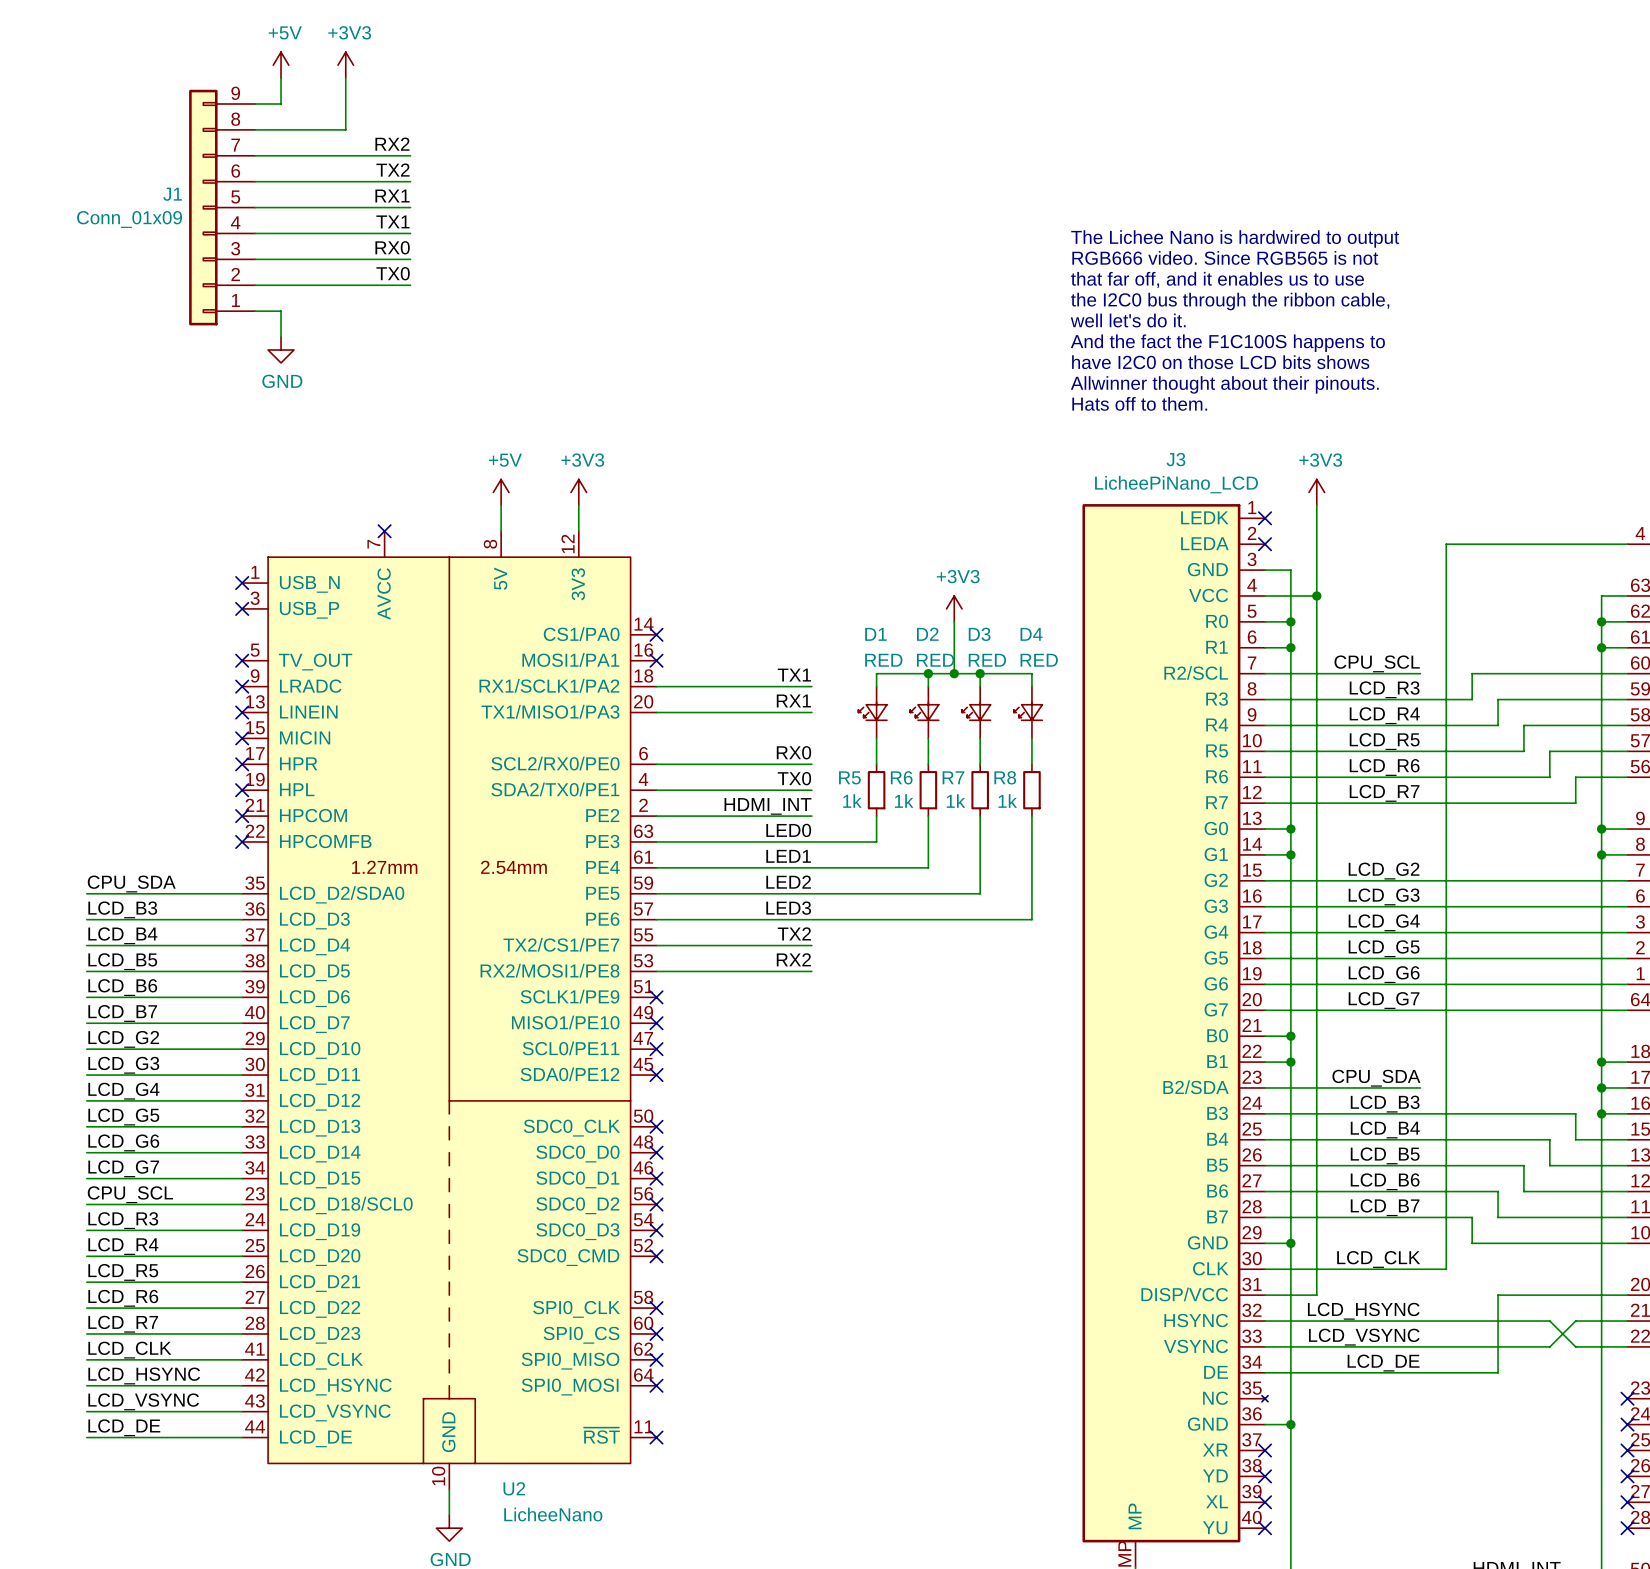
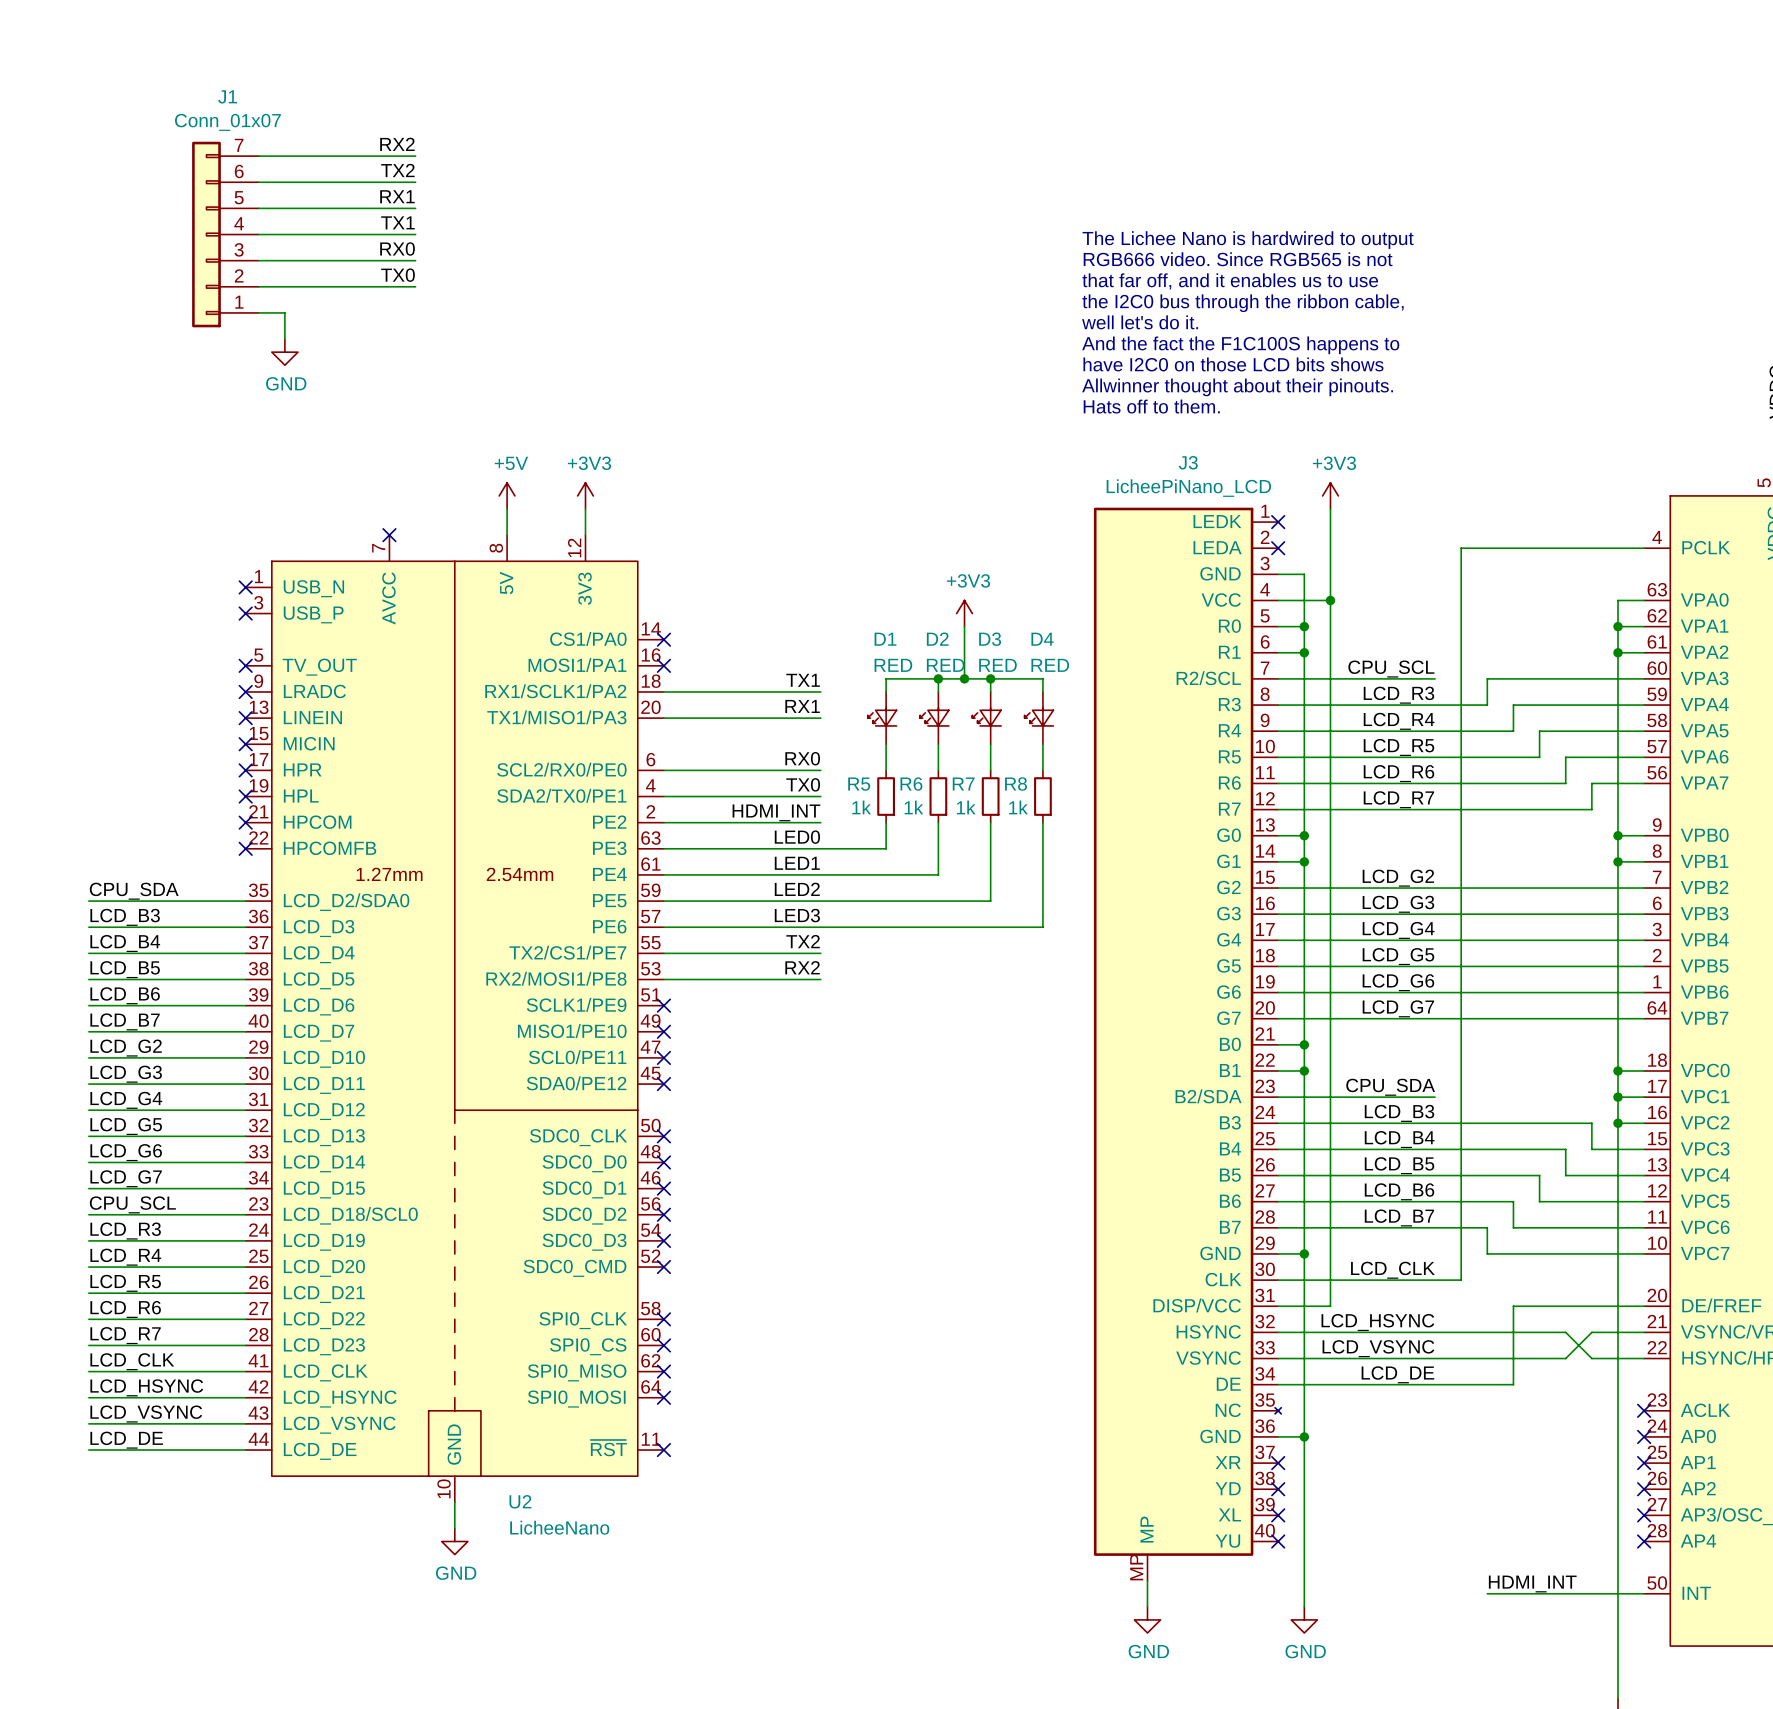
power symbol: +5V (281, 65) -> none
power symbol: +3V3 (345, 65) -> none
wire: (281, 78) (281, 104) (255, 104) -> none
wire: (345, 78) (345, 129) (255, 129) -> none
J1 symbol: [189, 89, 256, 326] -> [192, 141, 259, 328]
J1 name position: J1 (172, 194) -> J1 (227, 96)
J1 value: Conn_01x09 (129, 219) -> Conn_01x07 (227, 122)

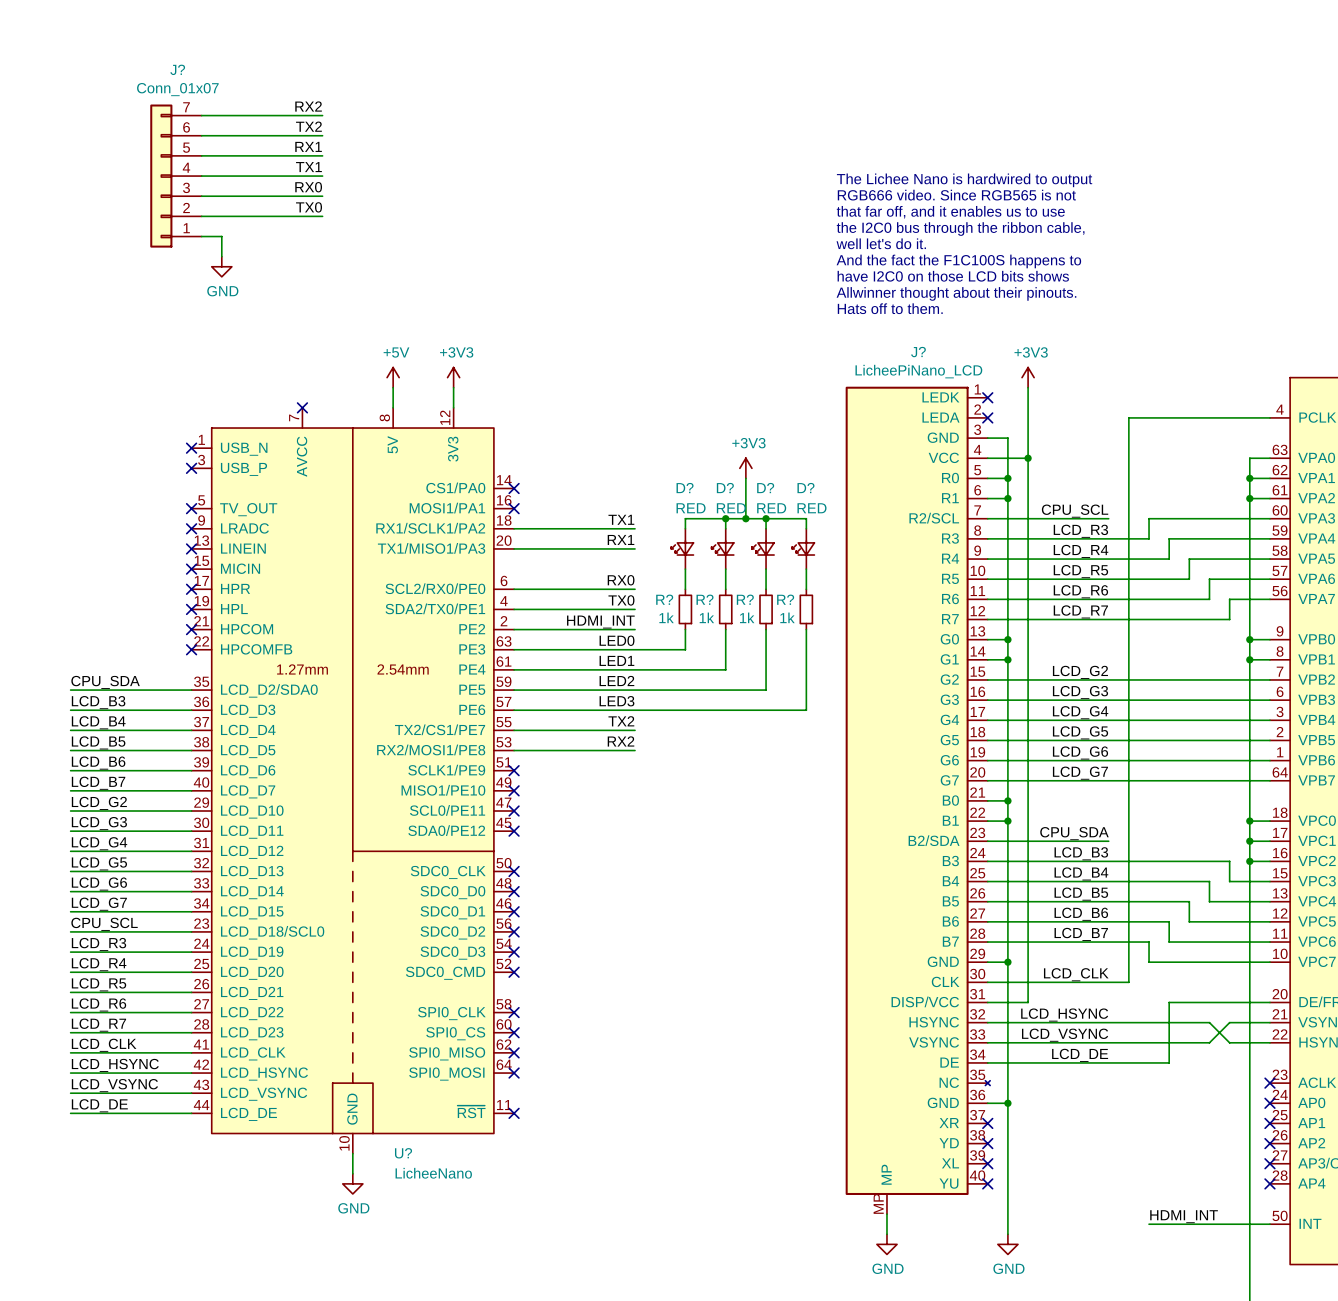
J1 name: J1 (227, 96) -> J? (177, 69)
J3 name: J3 (1188, 462) -> J? (918, 352)
D1 name: D1 (885, 639) -> D? (685, 488)
D2 name: D2 (937, 639) -> D? (725, 488)
D3 name: D3 (990, 639) -> D? (765, 488)
D4 name: D4 (1042, 639) -> D? (805, 488)
R5 name: R5 (859, 784) -> R? (664, 599)
R6 name: R6 (911, 784) -> R? (705, 599)
R7 name: R7 (963, 784) -> R? (745, 599)
R8 name: R8 (1016, 784) -> R? (785, 599)
U2 name: U2 (520, 1501) -> U? (403, 1153)

